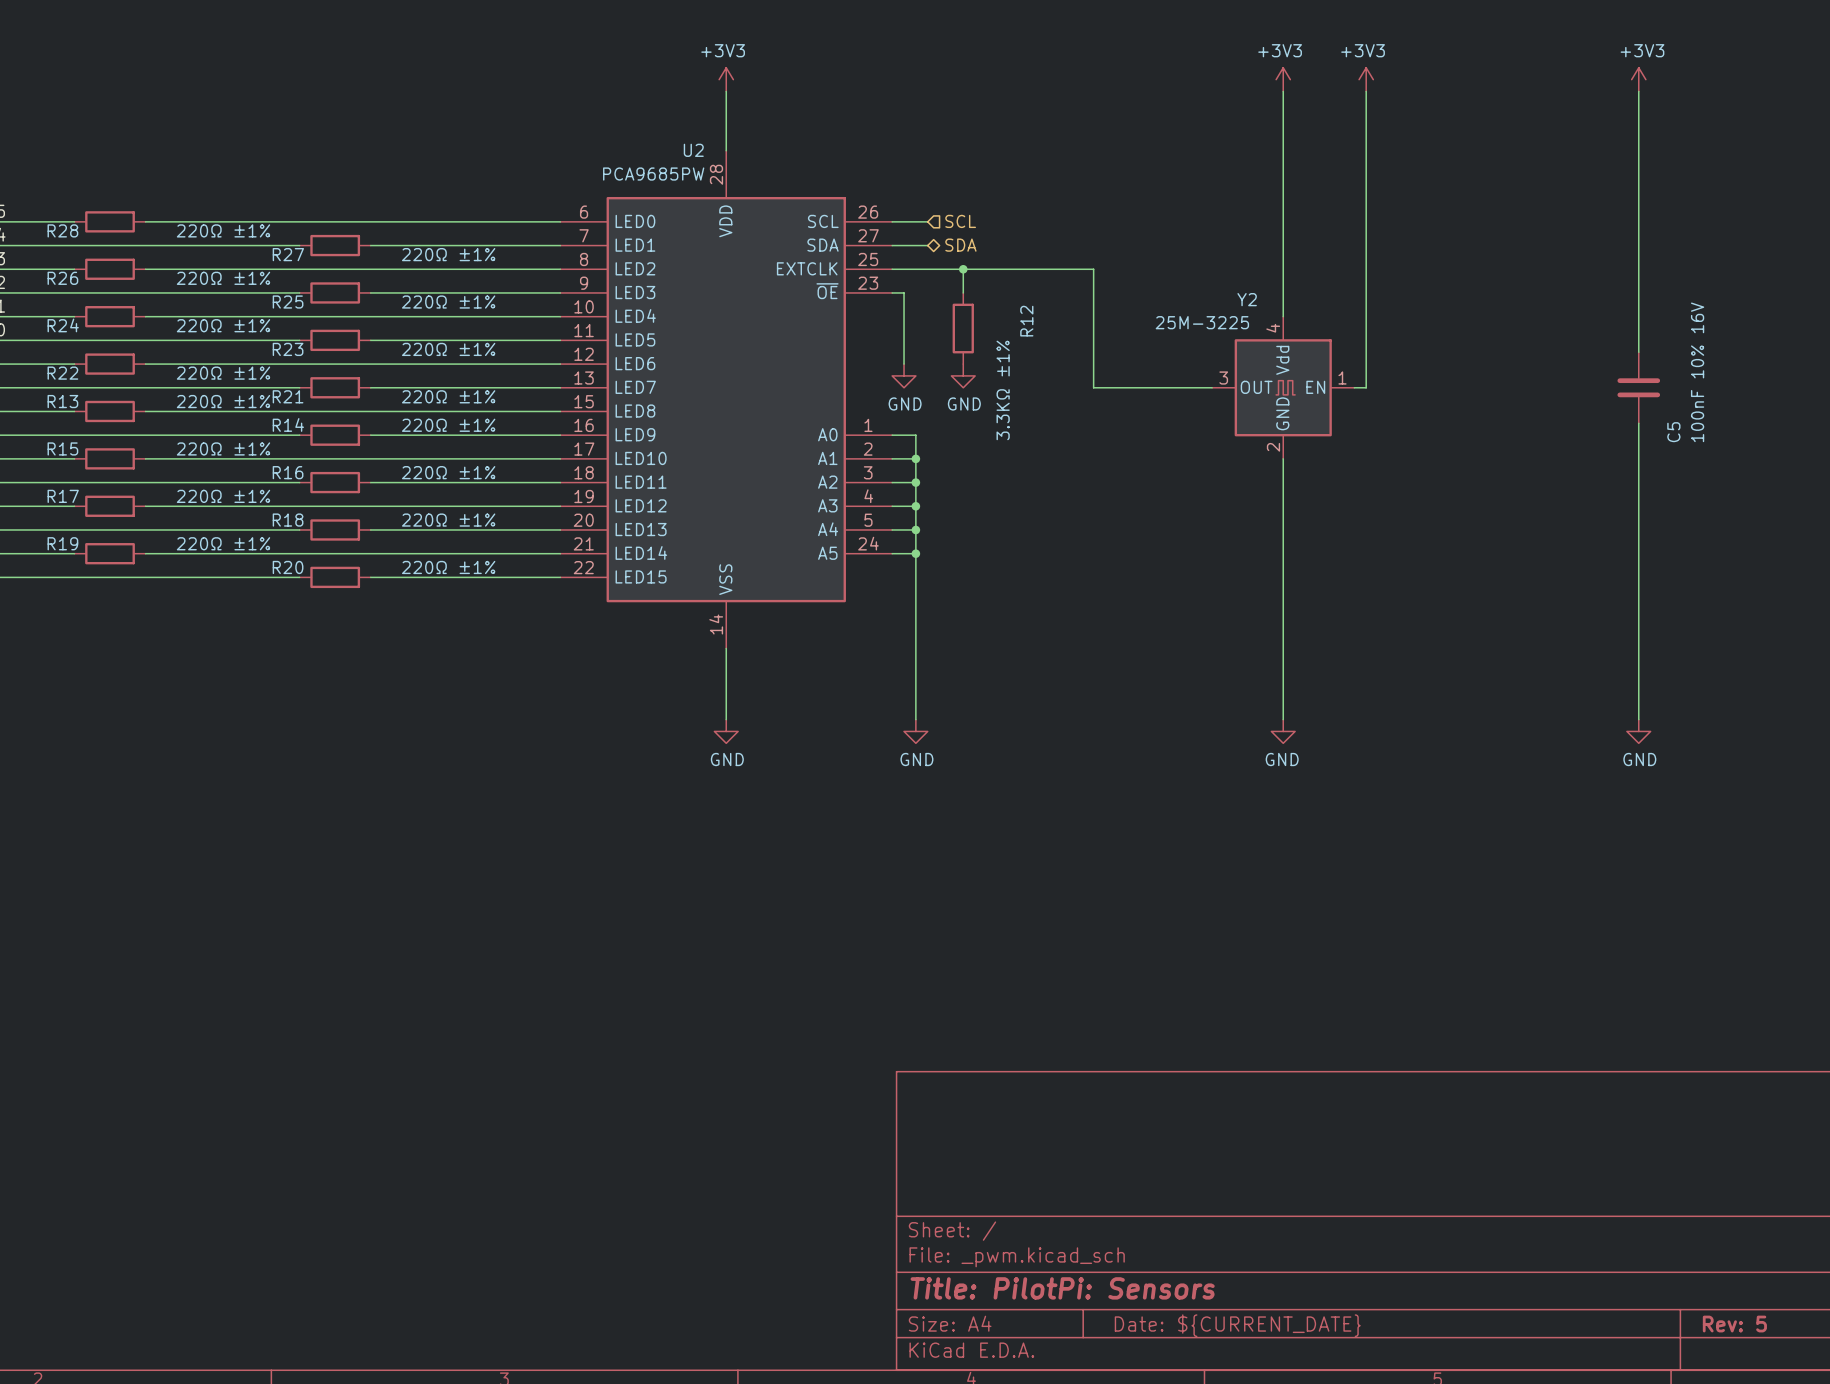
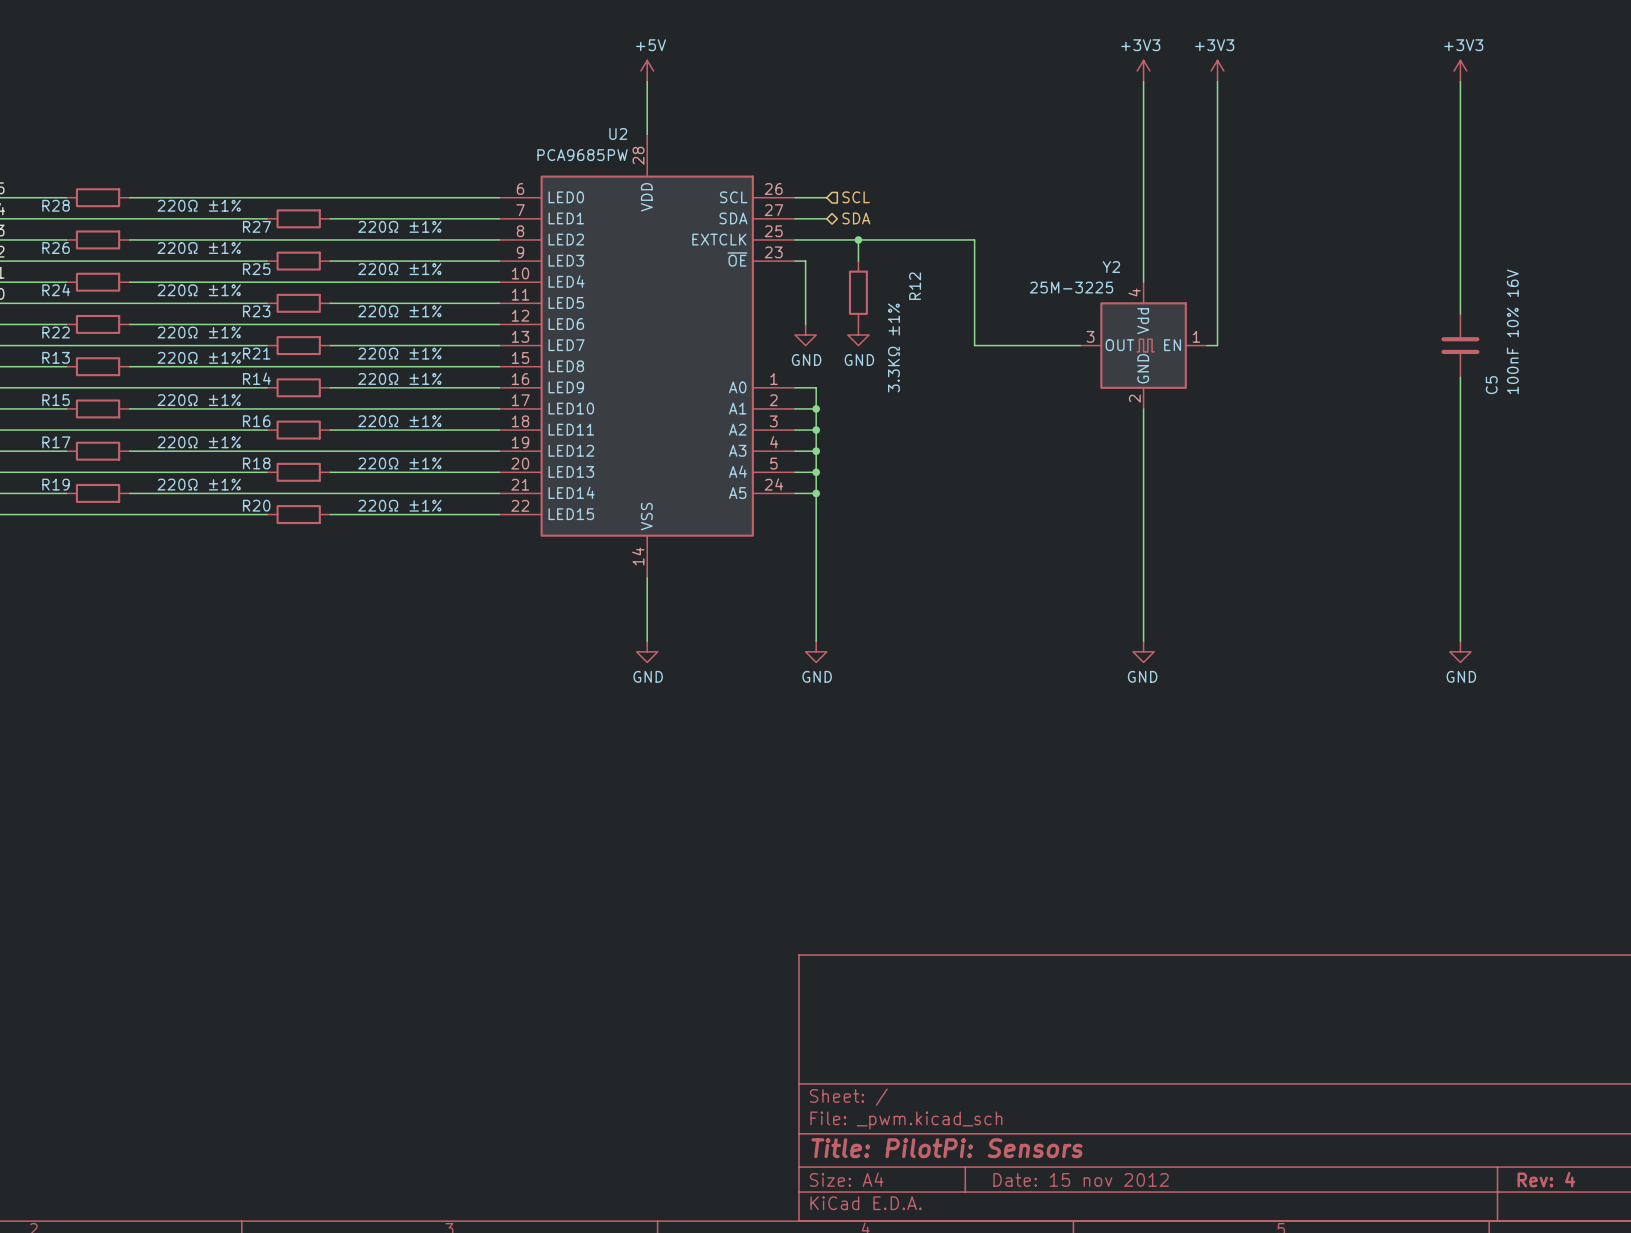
power symbol: +3V3 (726, 79) -> +5V (647, 70)
title block: Rev: 5 (1734, 1324) -> Rev: 4 (1546, 1179)
title block: Date: ${CURRENT_DATE} (1237, 1325) -> Date: 15 nov 2012 (1081, 1179)

